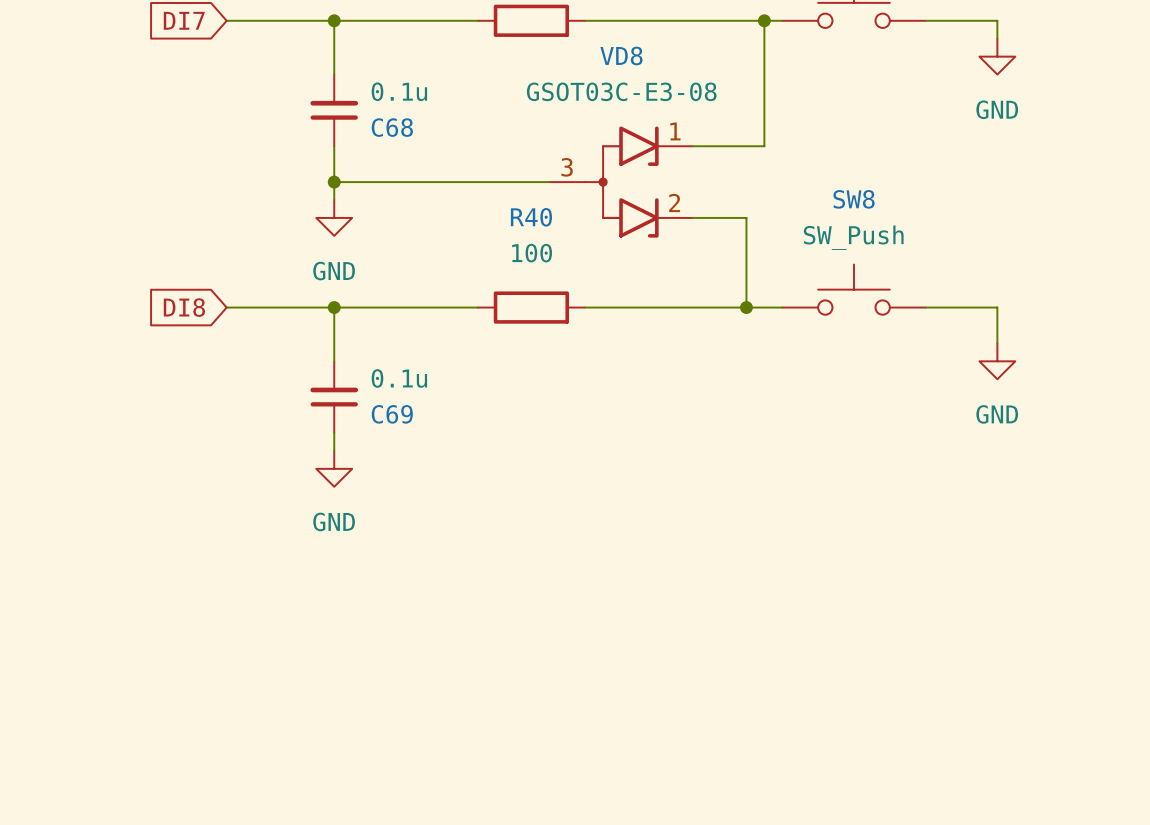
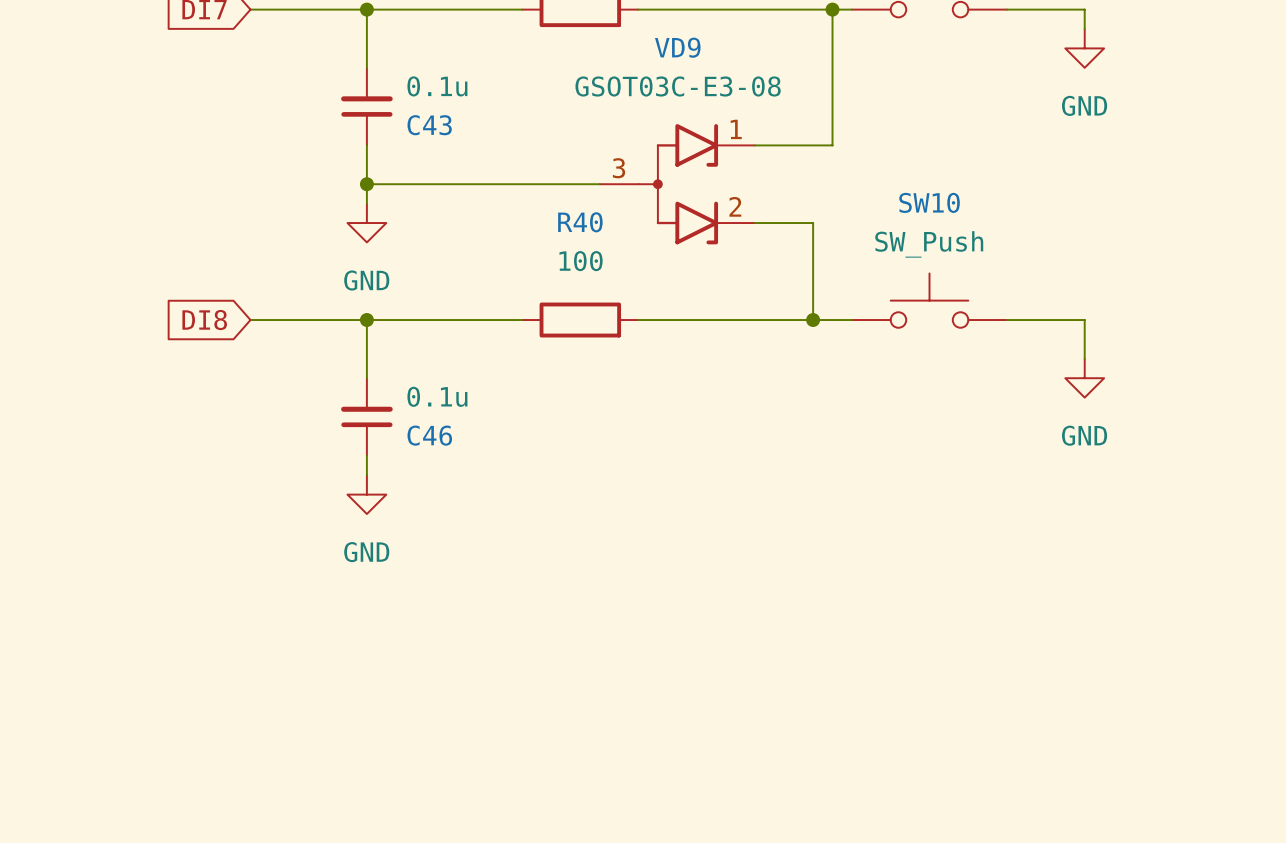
VD8 name: VD8 (621, 55) -> VD9 (677, 47)
C68 name: C68 (392, 127) -> C43 (429, 125)
SW8 name: SW8 (854, 199) -> SW10 (929, 202)
C69 name: C69 (392, 414) -> C46 (429, 435)

